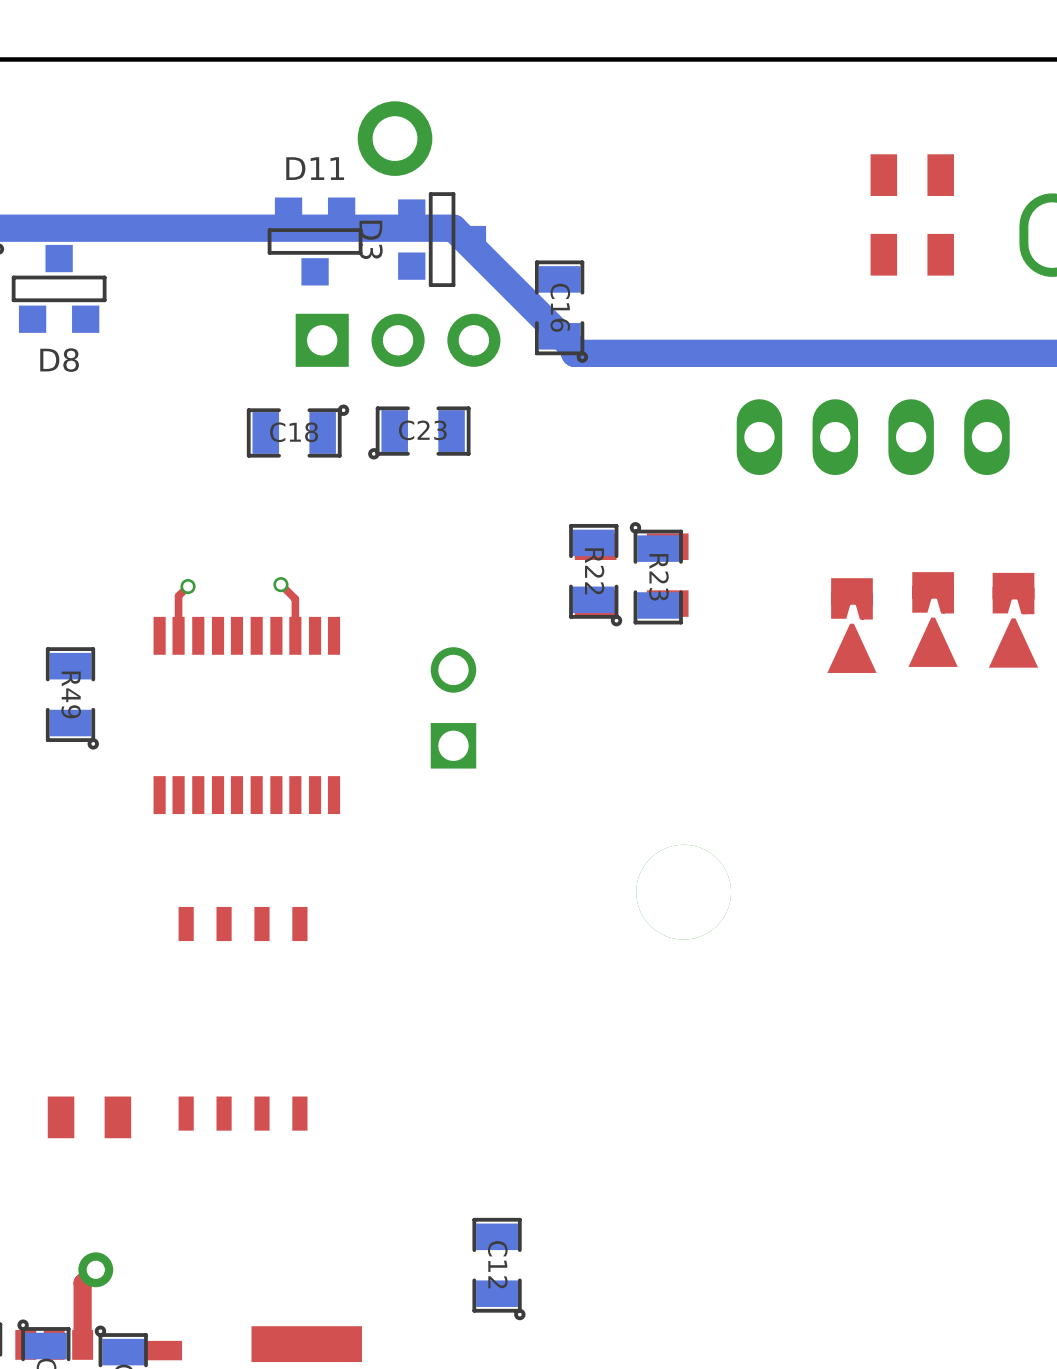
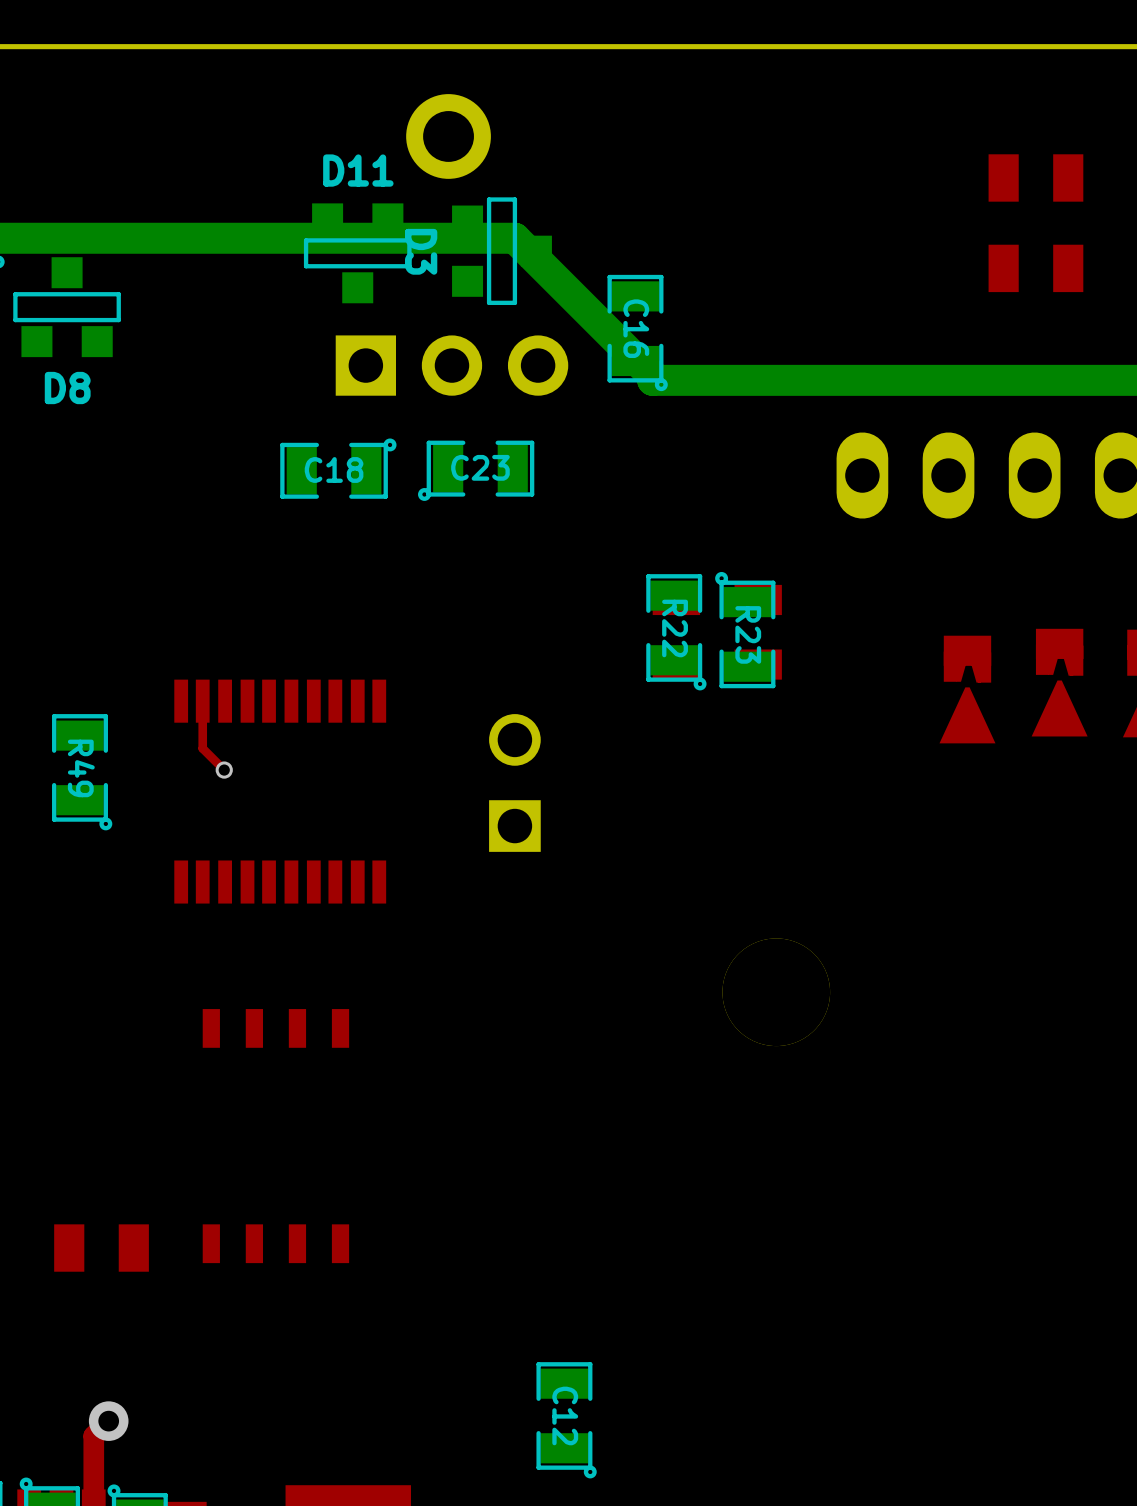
top track: (280, 584) (295, 599) (295, 635) -> none
via: (280, 584) -> none
top track: (188, 586) (178, 596) (178, 635) -> (224, 770) (202, 748) (202, 701)
via: (188, 586) -> none
via: none -> (224, 770)

